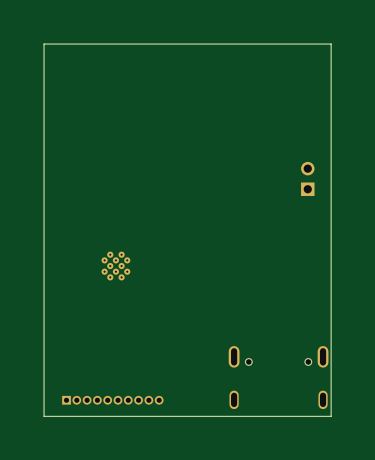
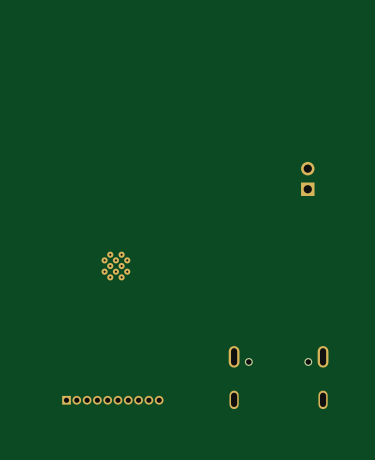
board edge: (331, 44) (44, 44) (44, 416) (331, 416) (331, 44) -> none

